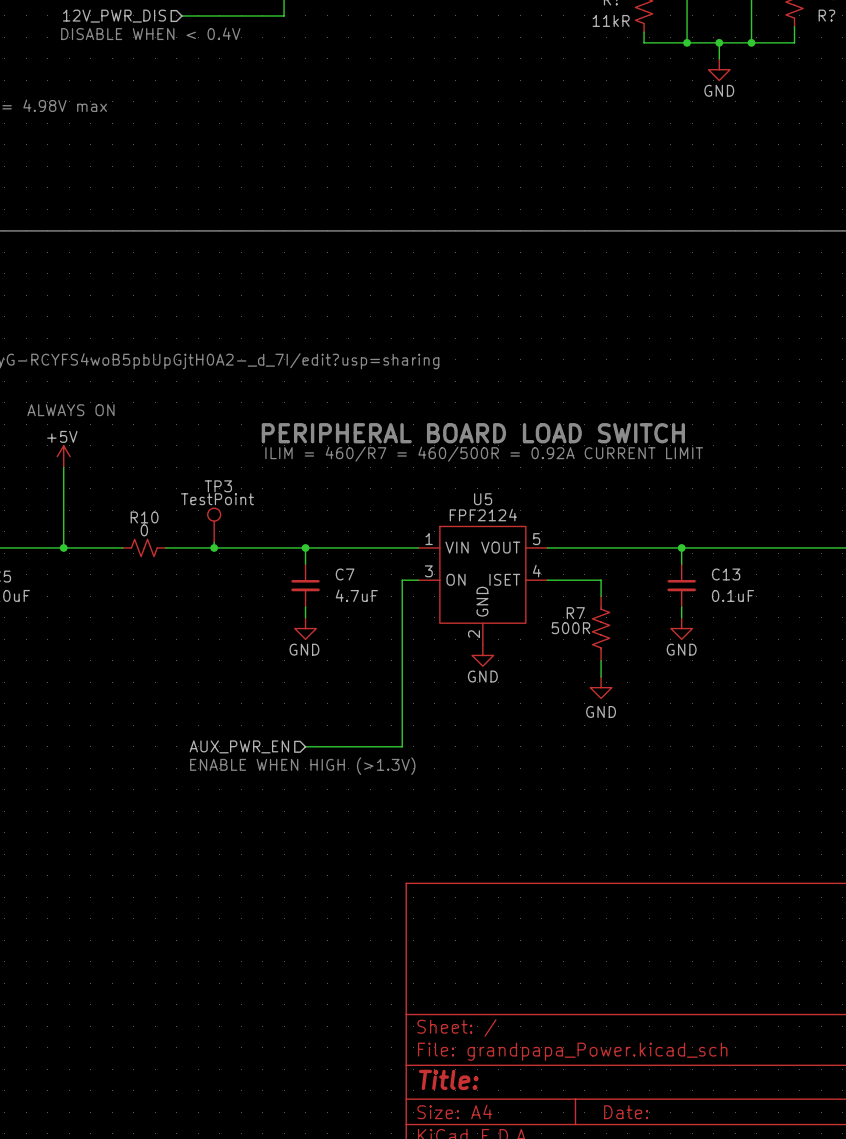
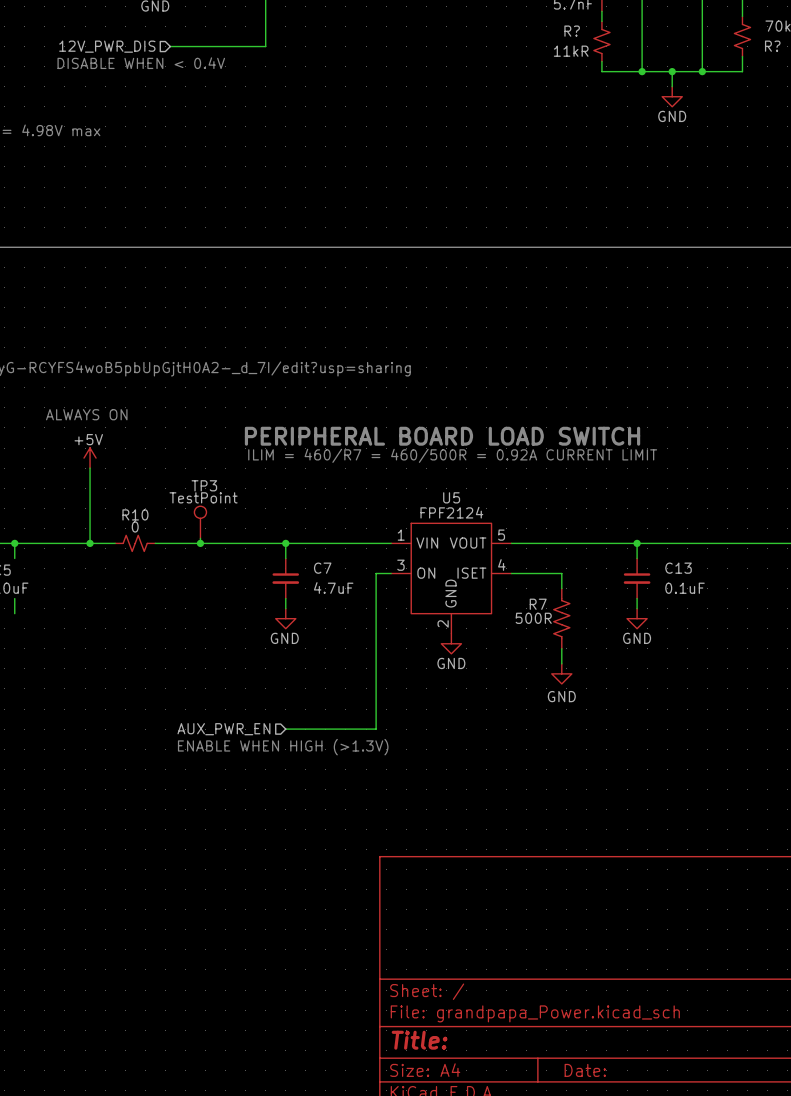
text position: ALWAYS ON (70, 410) -> ALWAYS ON (86, 414)
power symbol position: +5V (63, 456) -> +5V (90, 458)
wire: (63, 467) (63, 547) -> (90, 468) (90, 543)
wire: none -> (14, 543) (14, 558)
junction: none -> (14, 543)
junction: (63, 547) -> none
junction: none -> (90, 543)
wire: none -> (14, 598) (14, 613)

